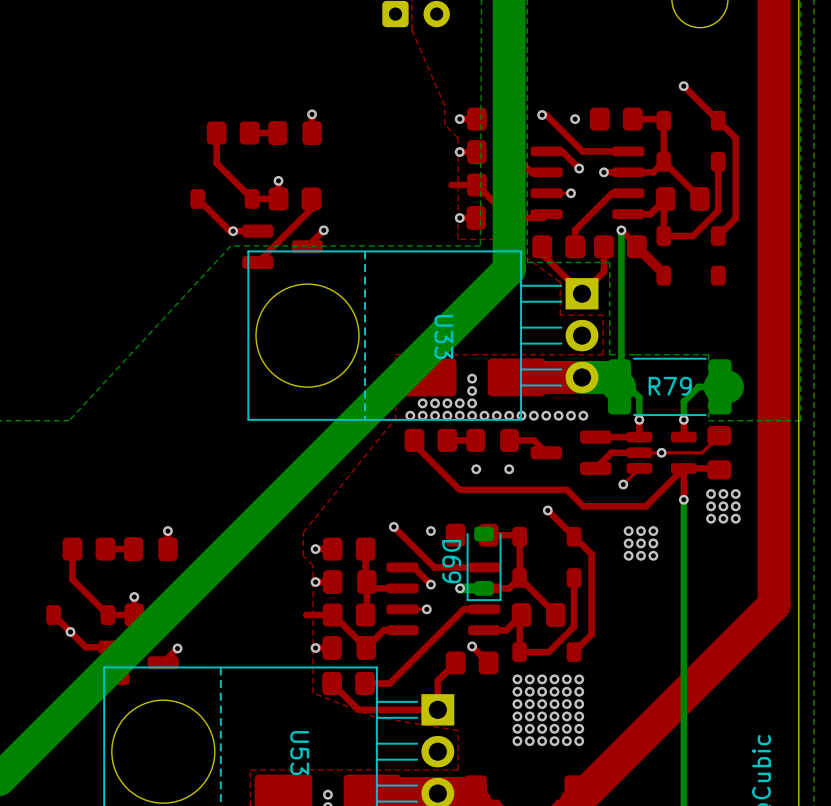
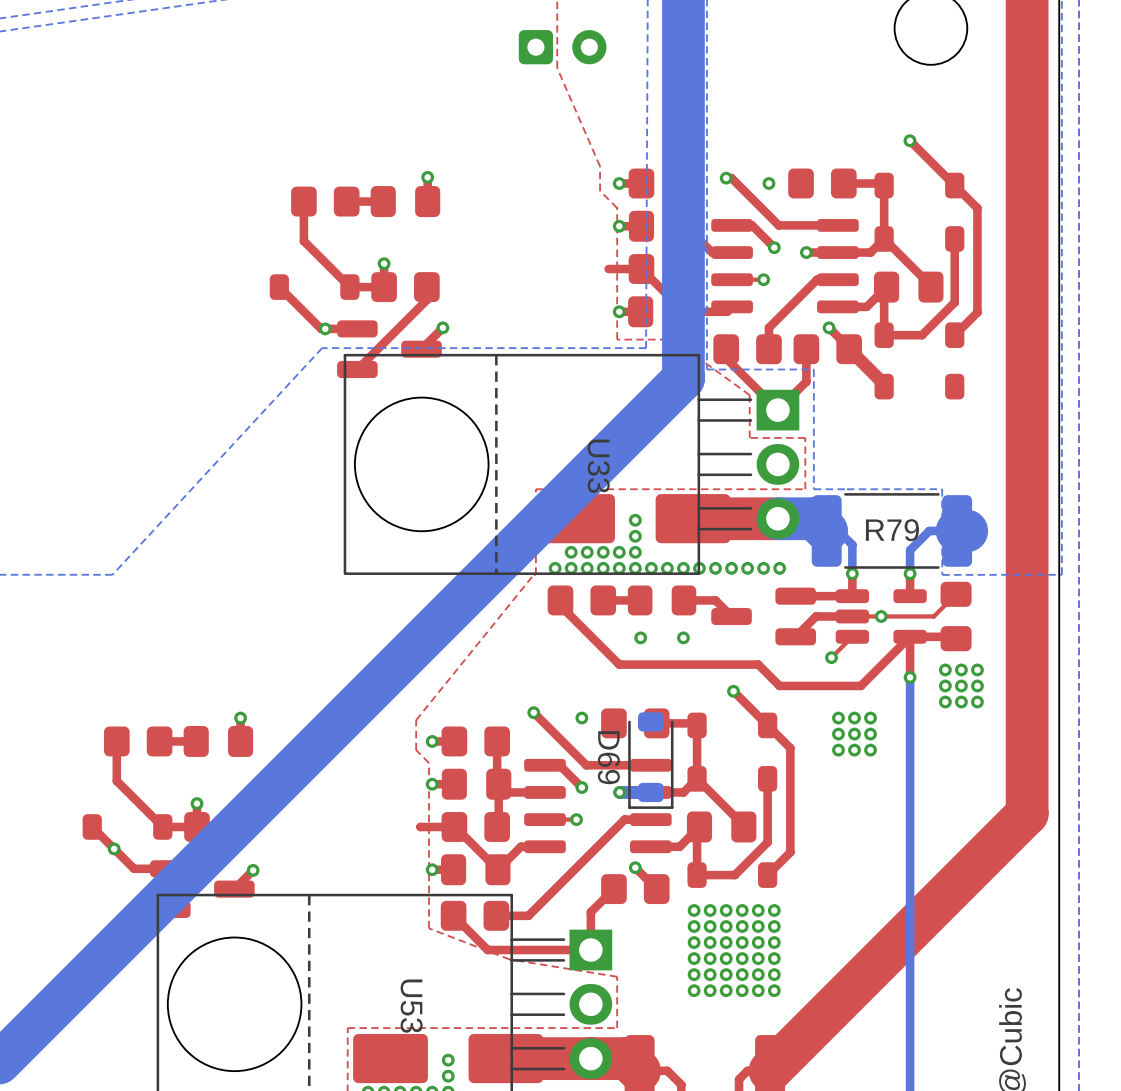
bottom track: (621, 230) (621, 385) (619, 386) -> none

